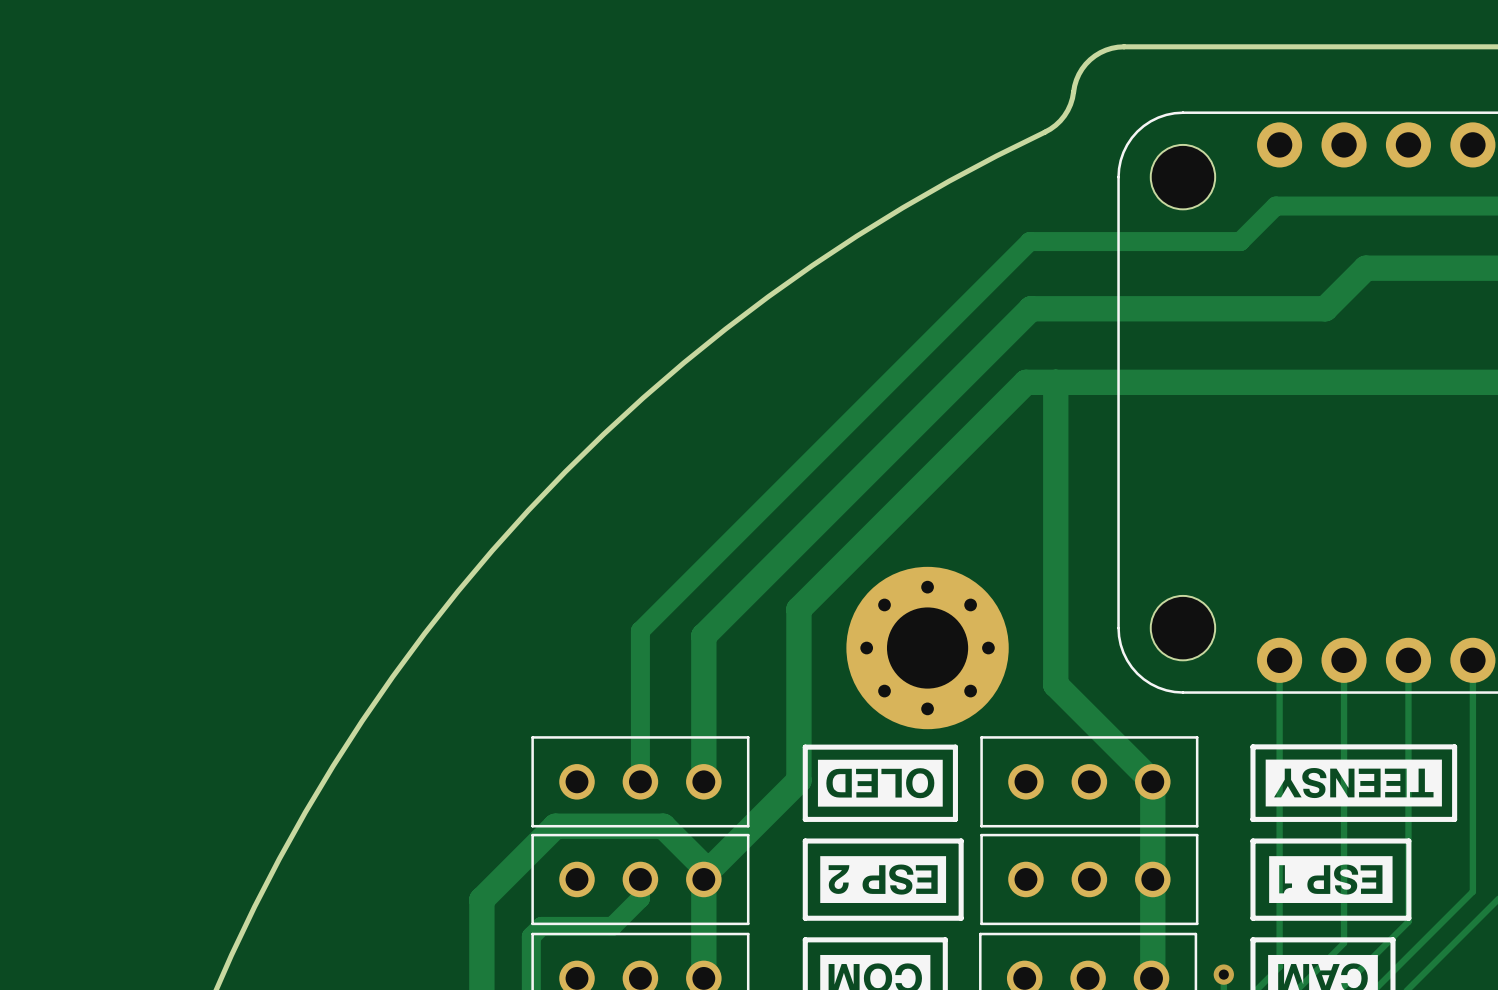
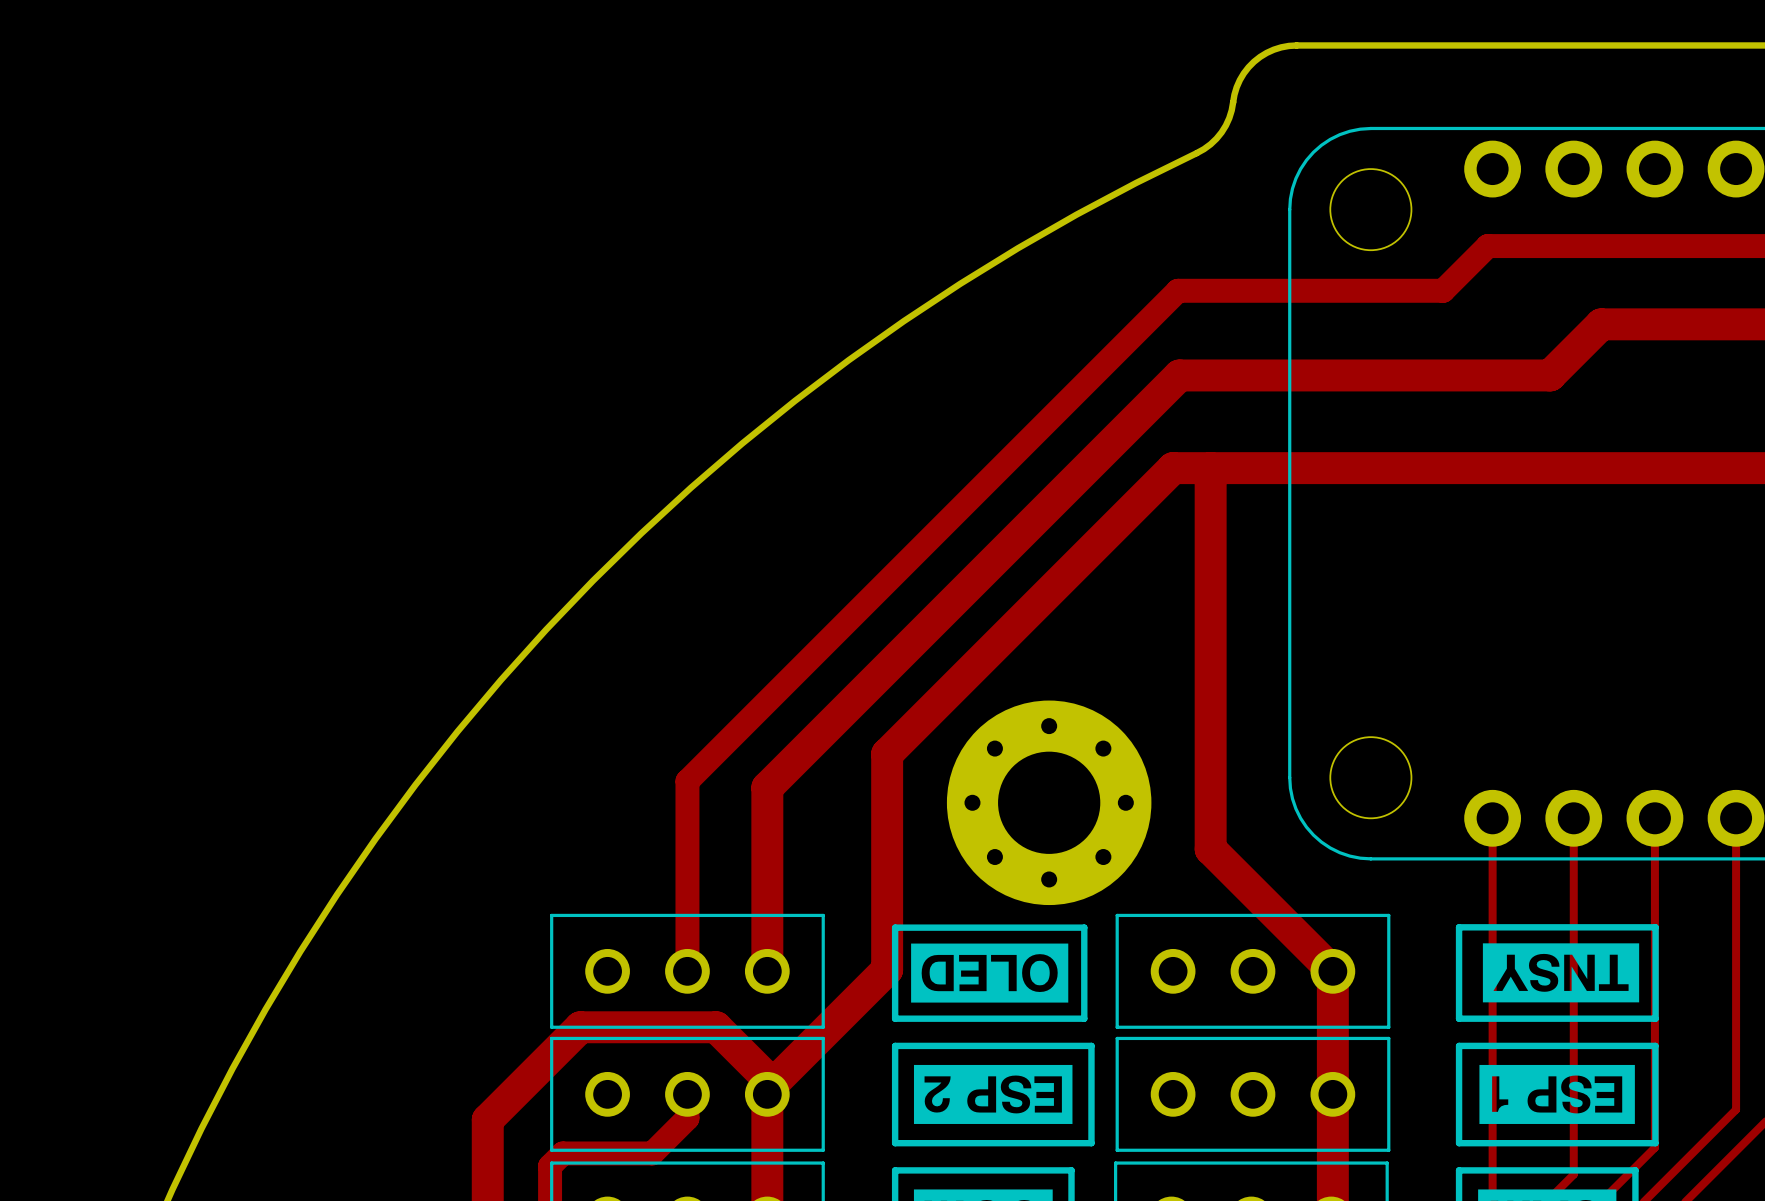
line: (1408, 746) (1454, 746) (1454, 819) (1408, 819) -> (1655, 927) (1655, 1018)
drawing shape: [1265, 759, 1442, 807] -> [1482, 943, 1640, 1003]

